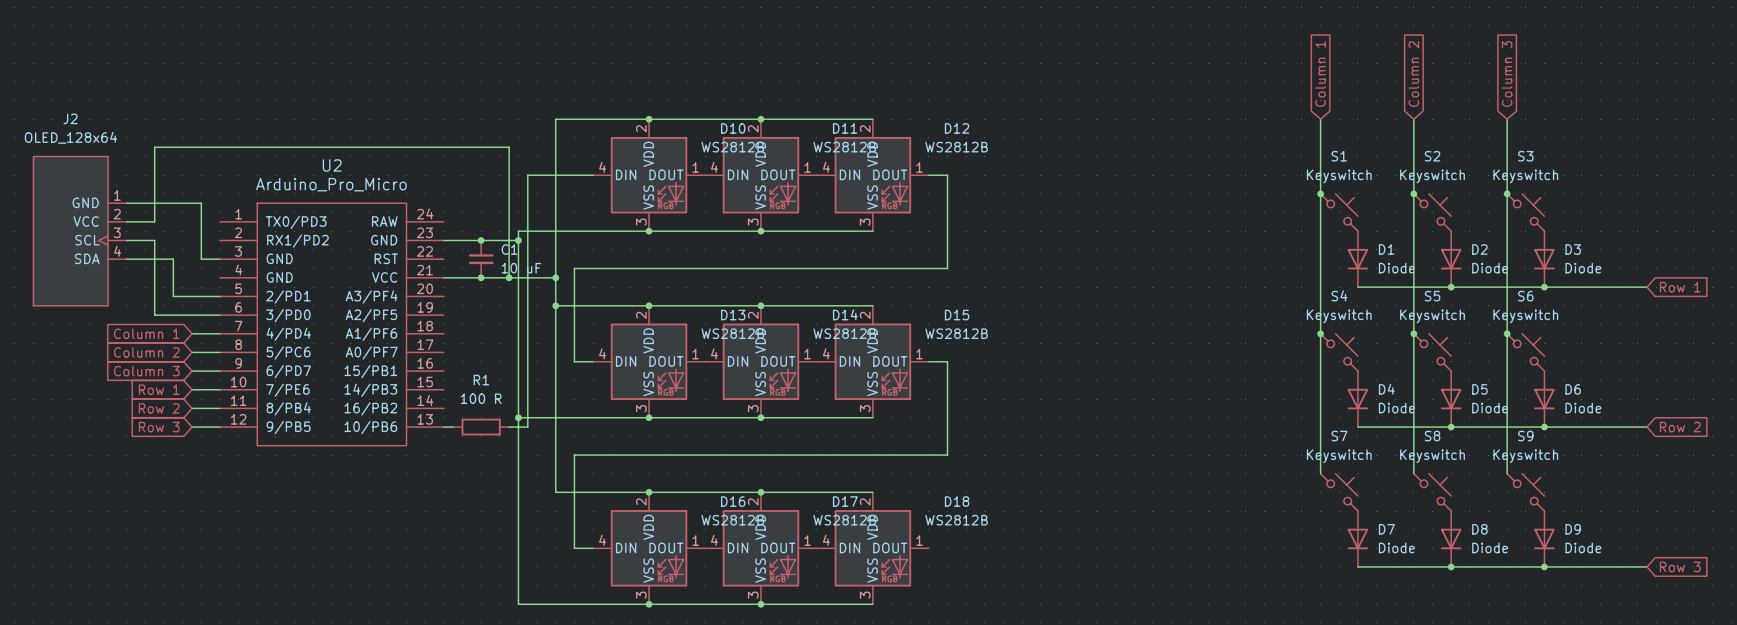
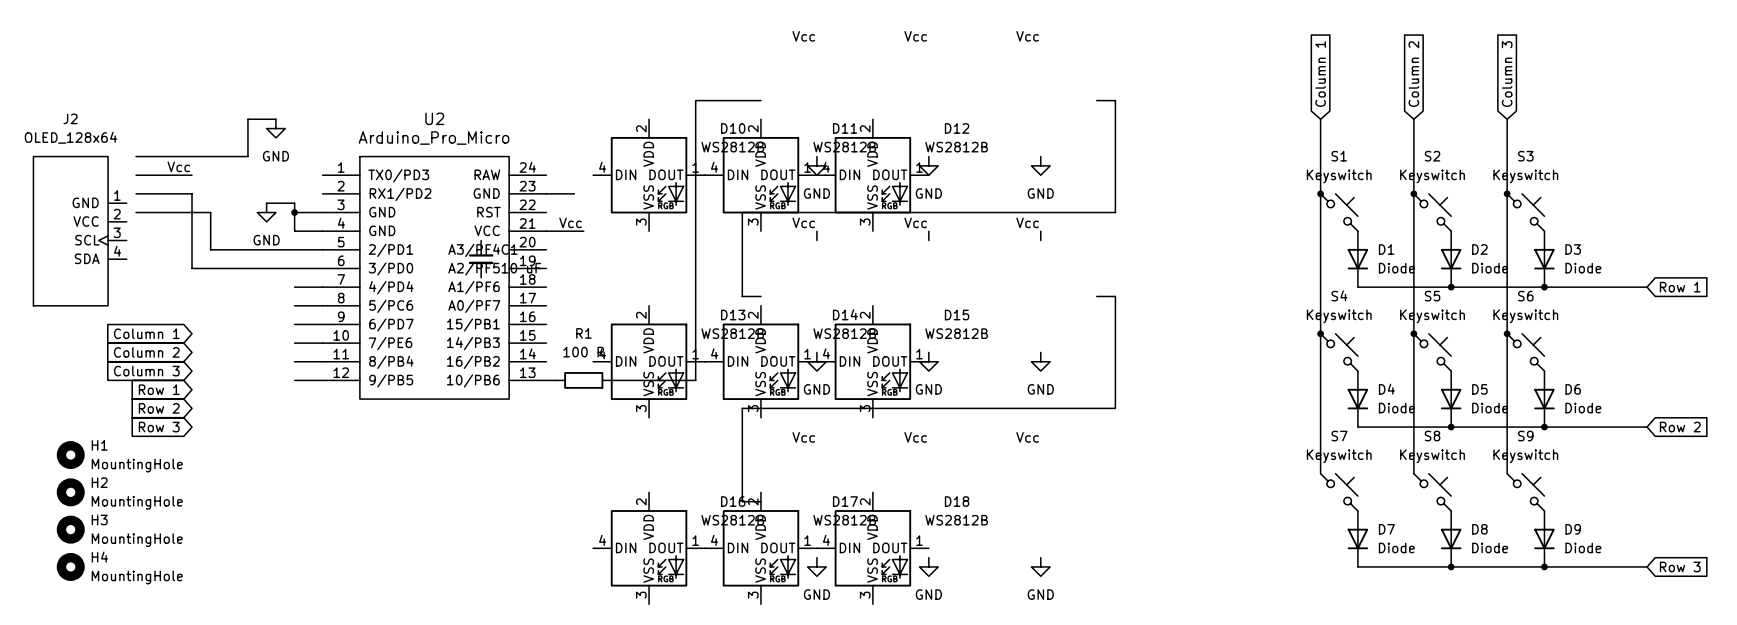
label: none -> Vcc (803, 36)
label: none -> Vcc (915, 36)
label: none -> Vcc (1027, 36)
wire: none -> (760, 100) (695, 100) (695, 380) (611, 380)
wire: none -> (1096, 100) (1115, 100) (1115, 212) (742, 212) (742, 296) (760, 296)
wire: none -> (275, 119) (247, 119) (247, 156) (136, 156)
junction: (649, 119) -> none
junction: (760, 119) -> none
wire: (872, 119) (555, 119) (555, 492) (872, 492) -> none
power symbol: none -> GND (275, 128)
power symbol: none -> GND (816, 165)
power symbol: none -> GND (928, 165)
power symbol: none -> GND (1040, 165)
label: none -> Vcc (178, 166)
wire: none -> (136, 175) (192, 175)
wire: (593, 175) (527, 175) (527, 427) (509, 427) -> none
wire: (928, 175) (947, 175) (947, 268) (574, 268) (574, 361) (593, 361) -> none
wire: none -> (136, 193) (192, 193) (192, 268) (322, 268)
wire: none -> (546, 193) (574, 193)
wire: (126, 203) (201, 203) (201, 259) (219, 259) -> none
wire: none -> (266, 203) (294, 203) (294, 231) (322, 231)
wire: none -> (136, 212) (210, 212) (210, 249) (322, 249)
power symbol: none -> GND (266, 212)
wire: none -> (294, 212) (322, 212)
junction: none -> (294, 212)
wire: (126, 221) (154, 221) (154, 147) (509, 147) (509, 277) -> none
label: none -> Vcc (570, 222)
label: none -> Vcc (803, 222)
label: none -> Vcc (915, 222)
label: none -> Vcc (1027, 222)
wire: (546, 231) (518, 231) (518, 604) (872, 604) -> none
wire: (583, 231) (872, 231) -> none
junction: (649, 231) -> none
junction: (760, 231) -> none
wire: none -> (816, 231) (816, 240)
wire: none -> (928, 231) (928, 240)
wire: none -> (1040, 231) (1040, 240)
wire: (126, 240) (154, 240) (154, 315) (219, 315) -> none
wire: (443, 240) (518, 240) -> none
junction: (481, 240) -> none
junction: (518, 240) -> none
wire: (126, 259) (173, 259) (173, 296) (219, 296) -> none
wire: (443, 277) (555, 277) -> none
junction: (481, 277) -> none
junction: (509, 277) -> none
junction: (555, 277) -> none
wire: none -> (1096, 296) (1115, 296) (1115, 408) (742, 408) (742, 501) (760, 501)
wire: (555, 305) (872, 305) -> none
junction: (555, 305) -> none
junction: (649, 305) -> none
junction: (760, 305) -> none
U2 position: (331, 324) -> (434, 277)
wire: (192, 333) (219, 333) -> (294, 287) (322, 287)
wire: (192, 352) (219, 352) -> (294, 305) (322, 305)
power symbol: none -> GND (816, 361)
wire: (928, 361) (947, 361) (947, 455) (574, 455) (574, 548) (593, 548) -> none
power symbol: none -> GND (928, 361)
power symbol: none -> GND (1040, 361)
wire: (192, 371) (219, 371) -> (294, 324) (322, 324)
wire: (192, 389) (219, 389) -> (294, 343) (322, 343)
wire: (192, 408) (219, 408) -> (294, 361) (322, 361)
wire: (518, 417) (872, 417) -> none
junction: (518, 417) -> none
junction: (649, 417) -> none
junction: (760, 417) -> none
wire: (192, 427) (219, 427) -> (294, 380) (322, 380)
wire: (443, 427) (453, 427) -> (546, 380) (555, 380)
R1 position: (481, 427) -> (583, 380)
label: none -> Vcc (803, 437)
label: none -> Vcc (915, 437)
label: none -> Vcc (1027, 437)
H1: none -> MountingHole (70, 455)
H2: none -> MountingHole (70, 492)
junction: (649, 492) -> none
junction: (760, 492) -> none
H3: none -> MountingHole (70, 529)
H4: none -> MountingHole (70, 566)
power symbol: none -> GND (816, 566)
power symbol: none -> GND (928, 566)
power symbol: none -> GND (1040, 566)
junction: (649, 604) -> none
junction: (760, 604) -> none

